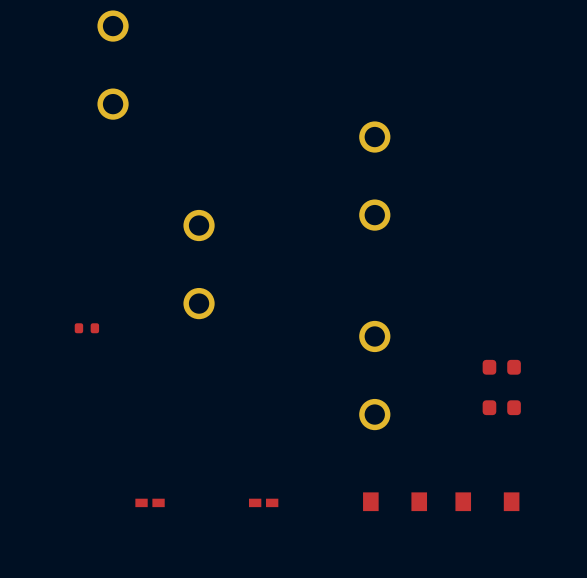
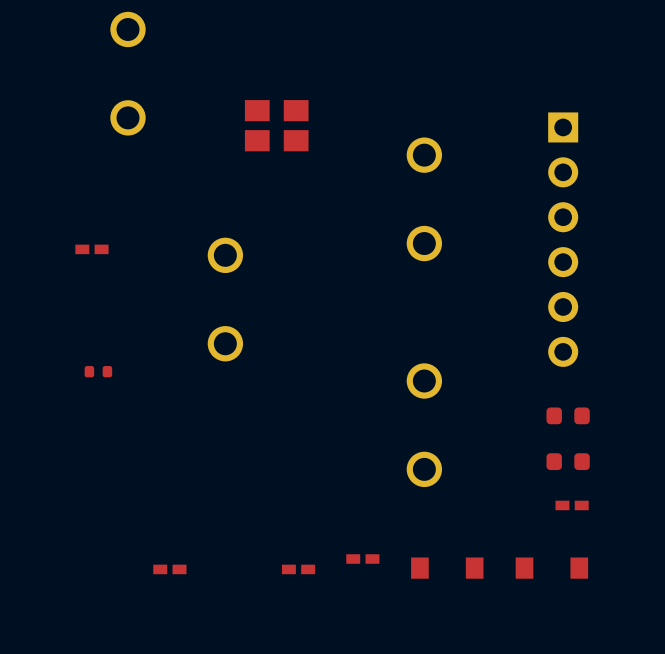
part: none -> (276, 125)
part: none -> (563, 239)
part: none -> (91, 249)
part: none -> (572, 505)
part: none -> (362, 559)

